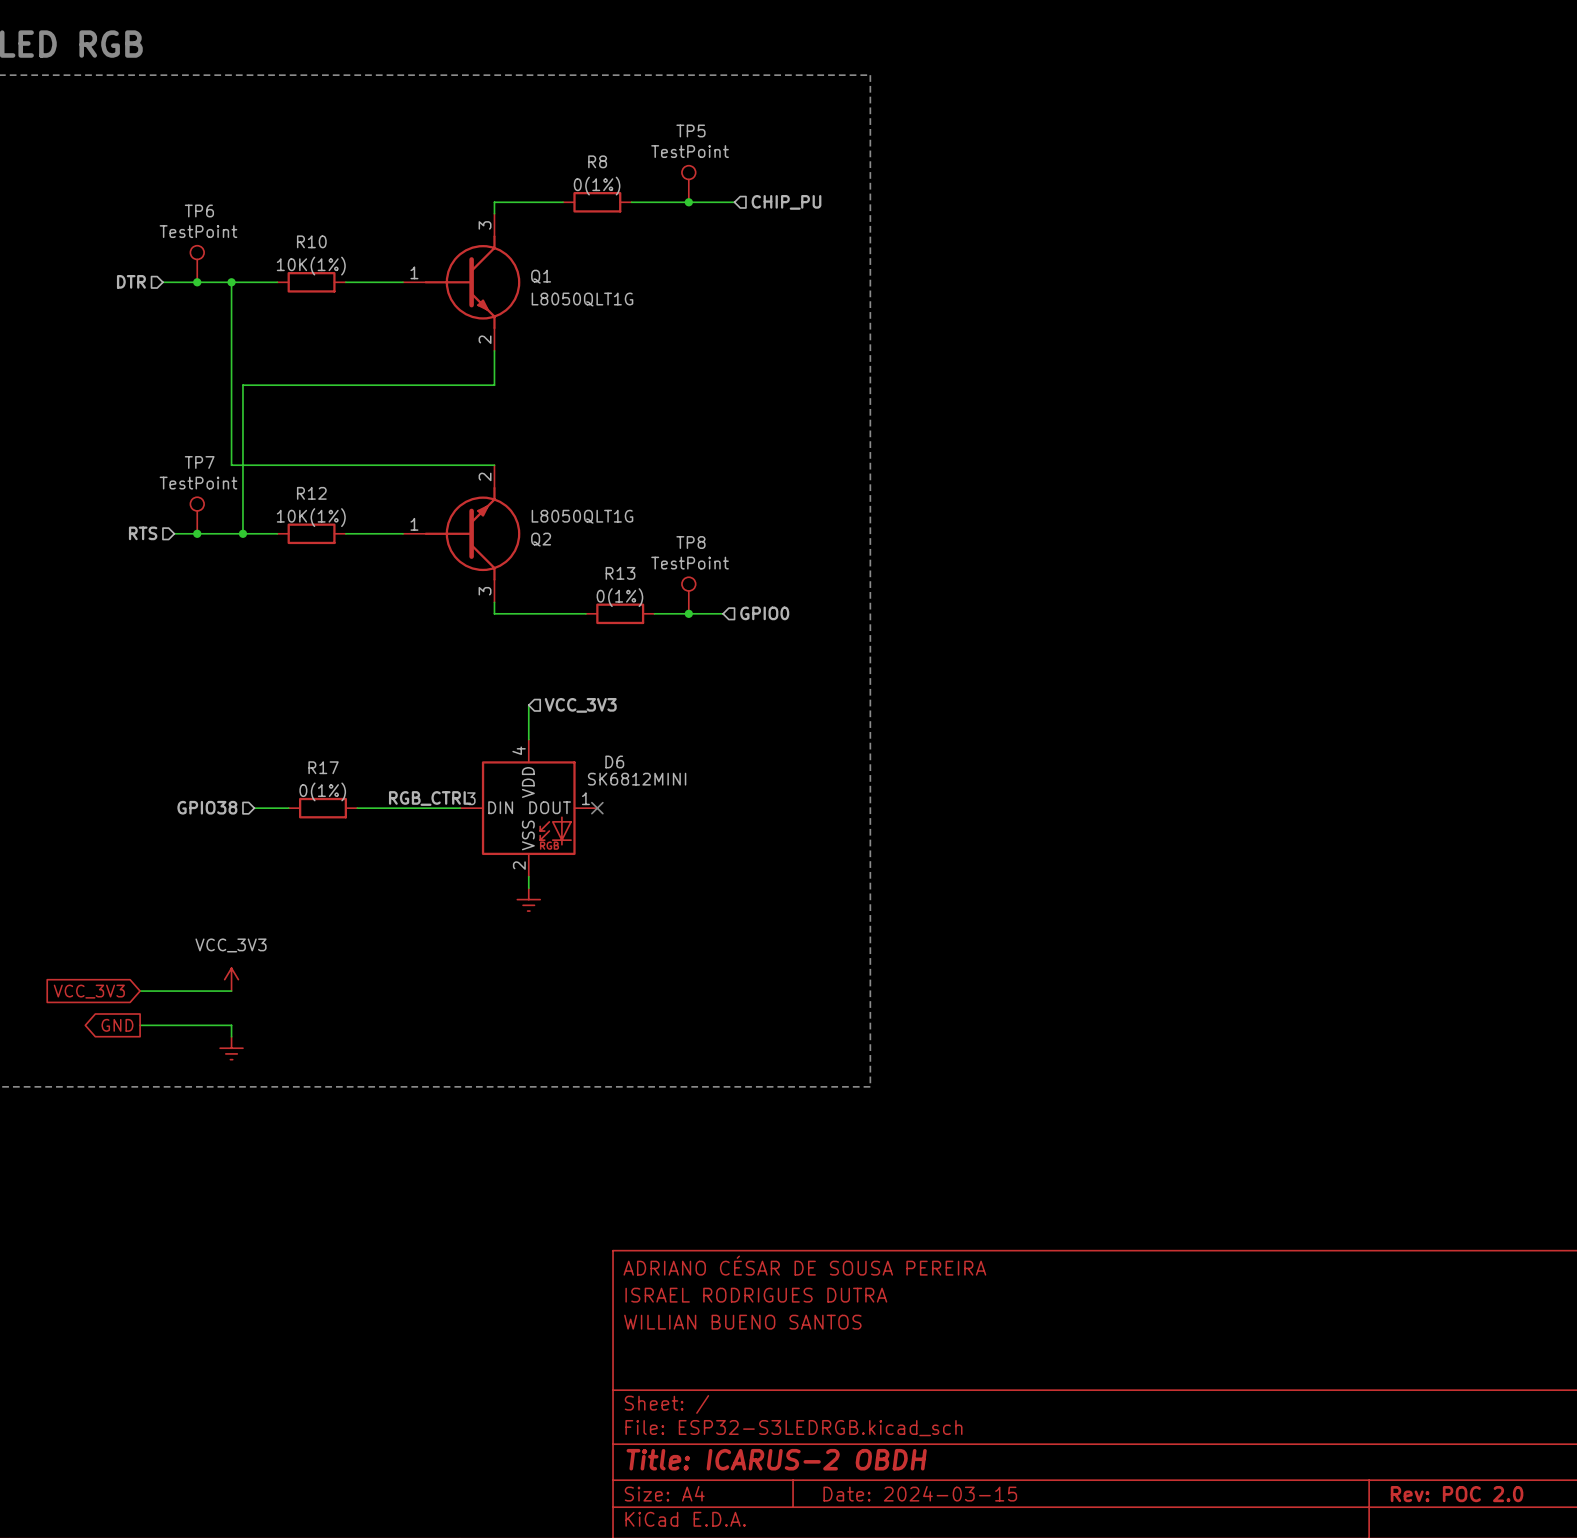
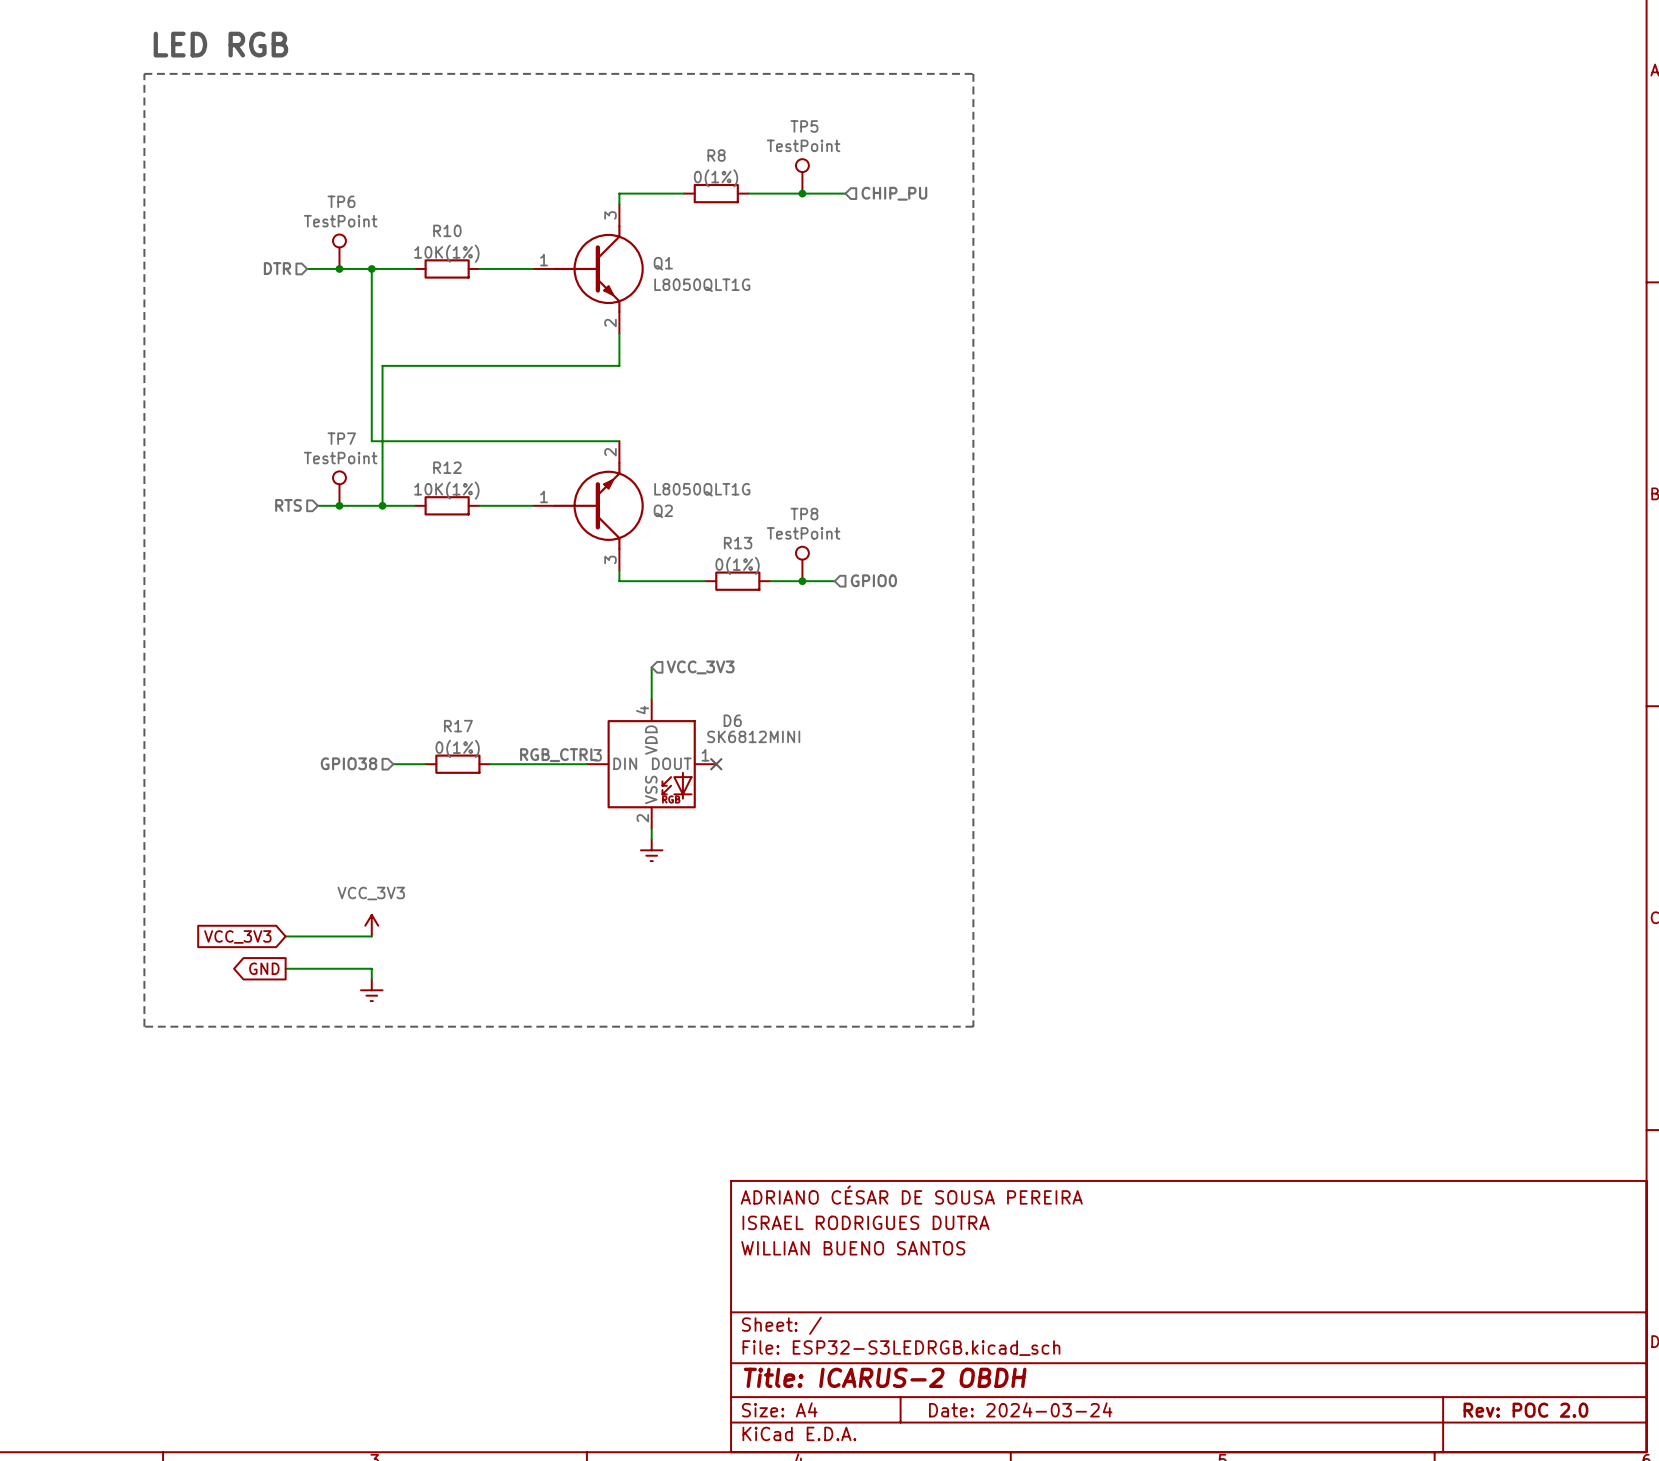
title block: Date: 2024-03-15 (920, 1493) -> Date: 2024-03-24 (1020, 1409)

